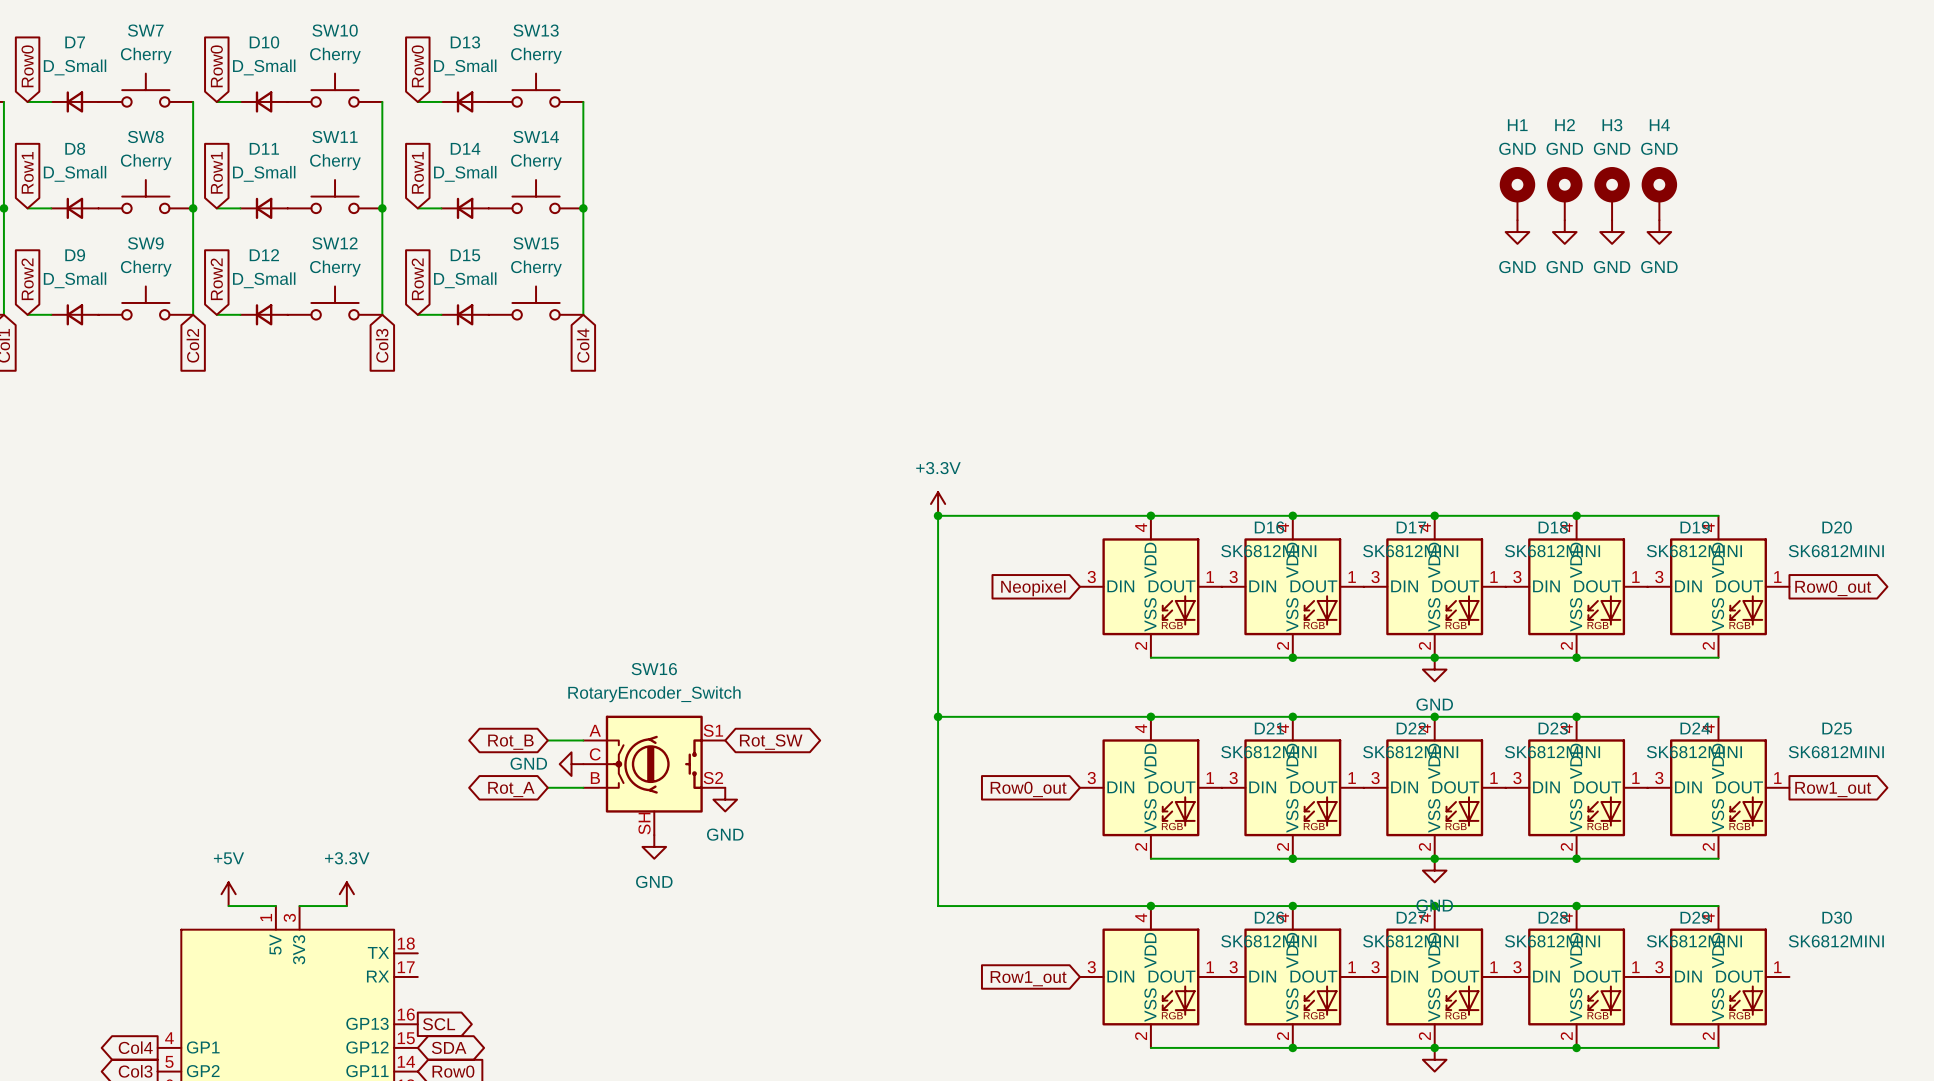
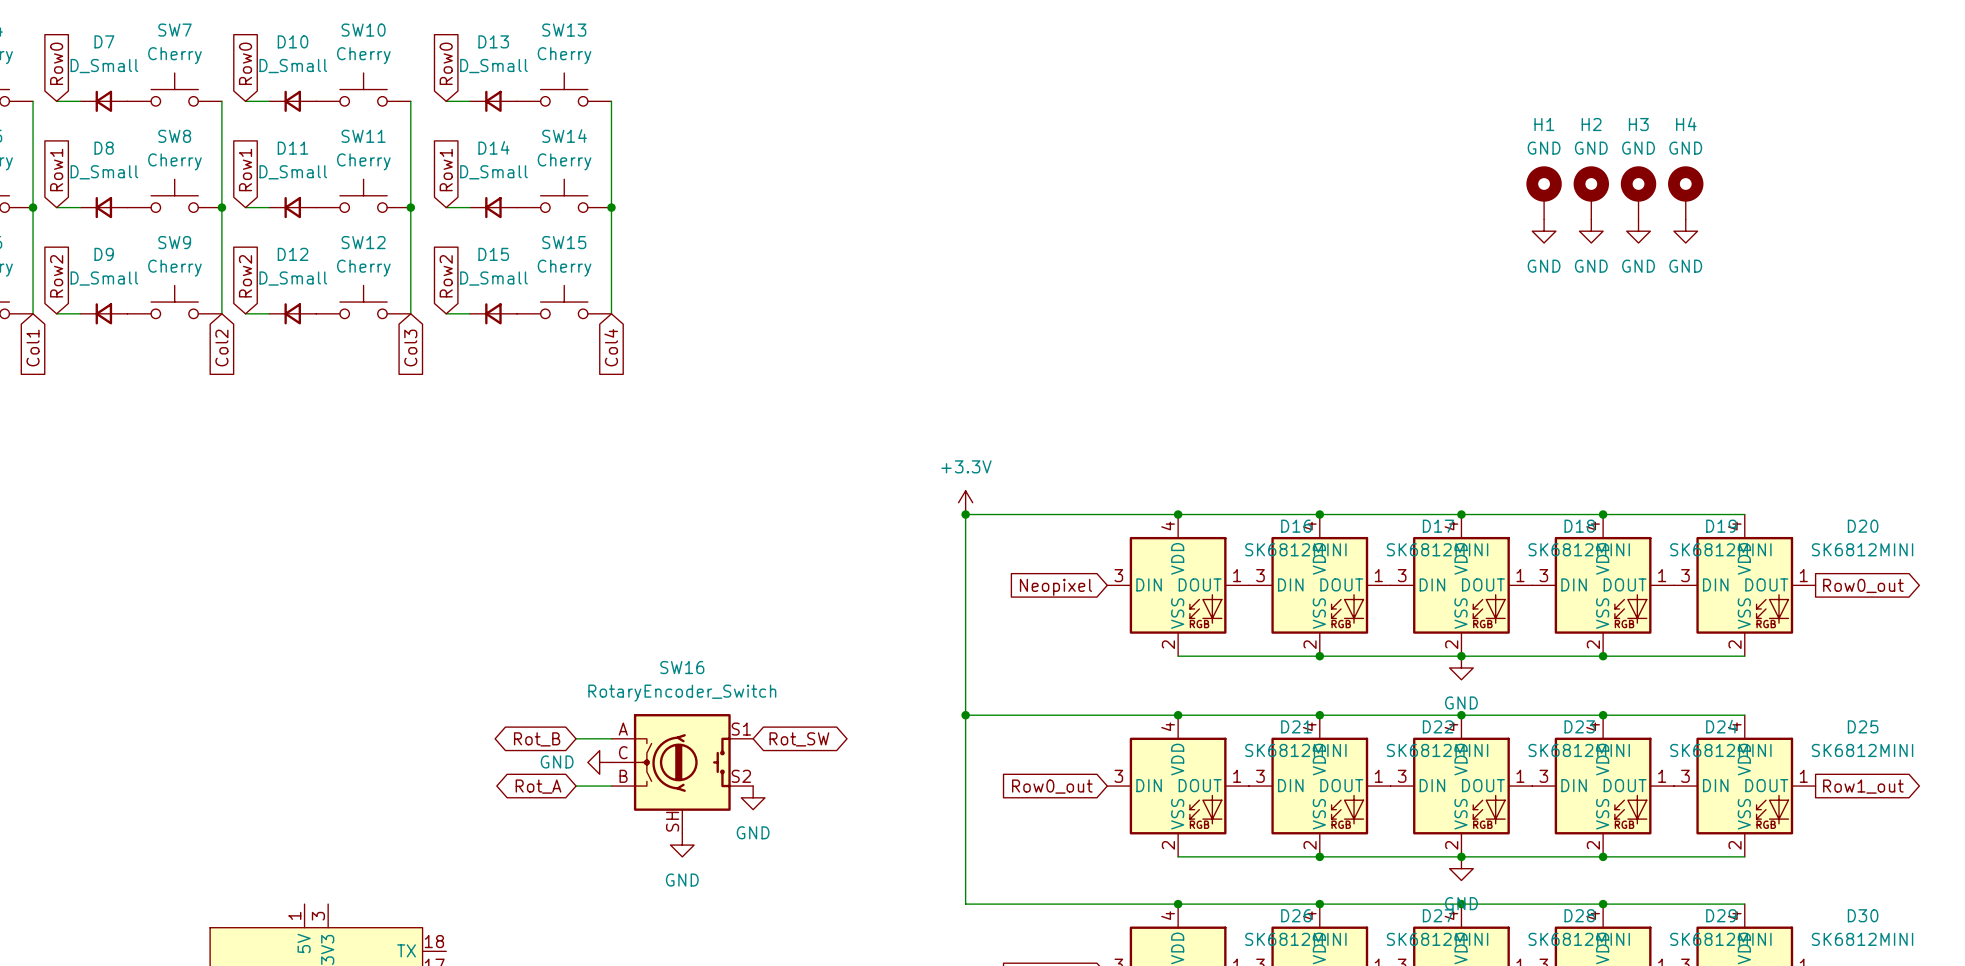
power symbol: +5V (228, 894) -> none
power symbol: +3.3V (346, 894) -> none
wire: (228, 906) (275, 906) -> none
wire: (299, 906) (346, 906) -> none

